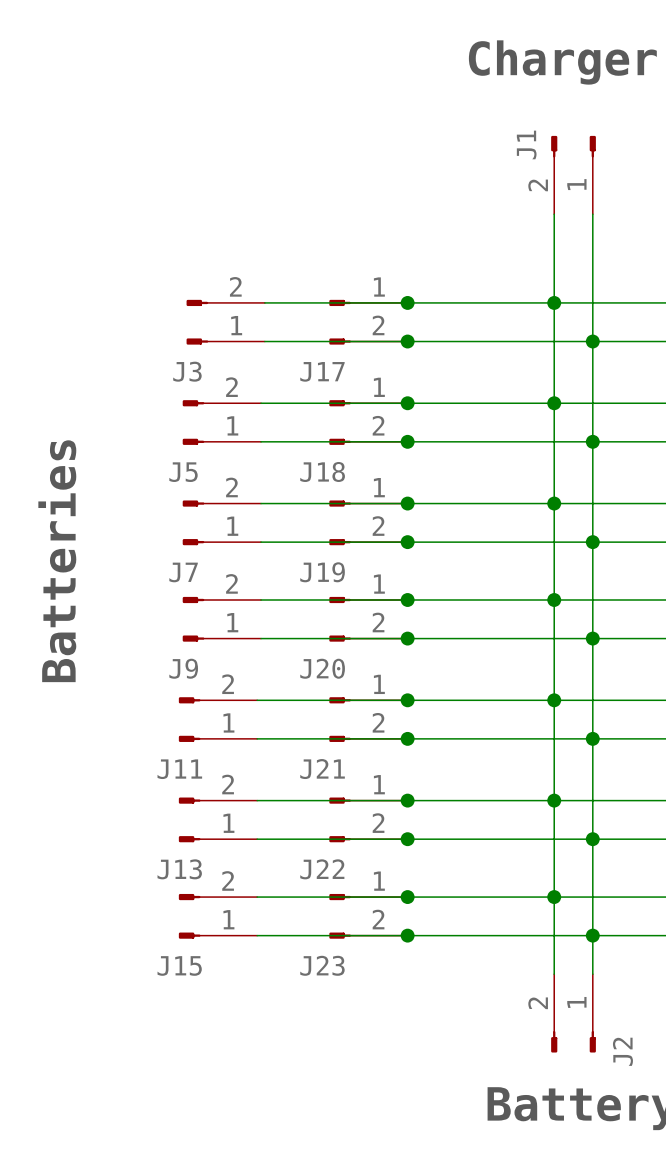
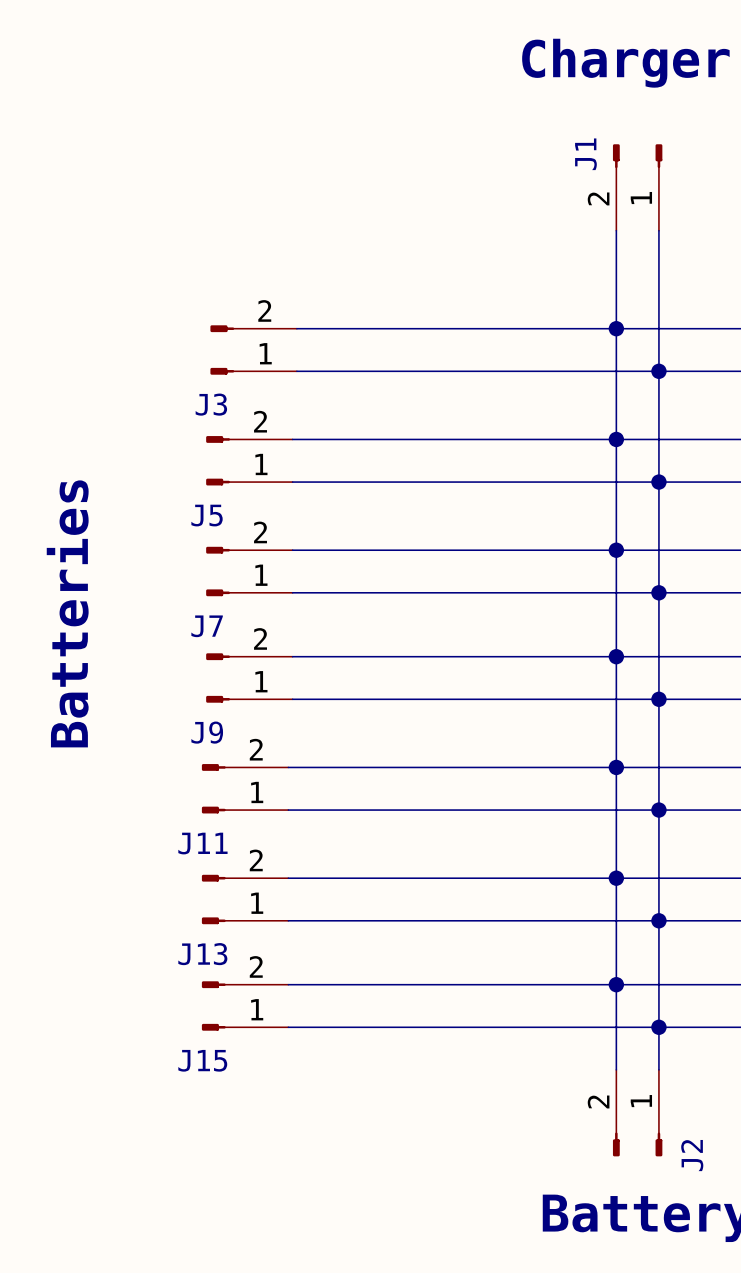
junction: (407, 302) -> none
J17: (368, 322) -> none
junction: (407, 341) -> none
junction: (407, 403) -> none
J18: (368, 422) -> none
junction: (407, 441) -> none
junction: (407, 503) -> none
J19: (368, 522) -> none
junction: (407, 542) -> none
junction: (407, 600) -> none
J20: (368, 619) -> none
junction: (407, 638) -> none
junction: (407, 700) -> none
J21: (368, 719) -> none
junction: (407, 738) -> none
junction: (407, 800) -> none
J22: (368, 819) -> none
junction: (407, 839) -> none
junction: (407, 897) -> none
J23: (368, 916) -> none
junction: (407, 935) -> none

